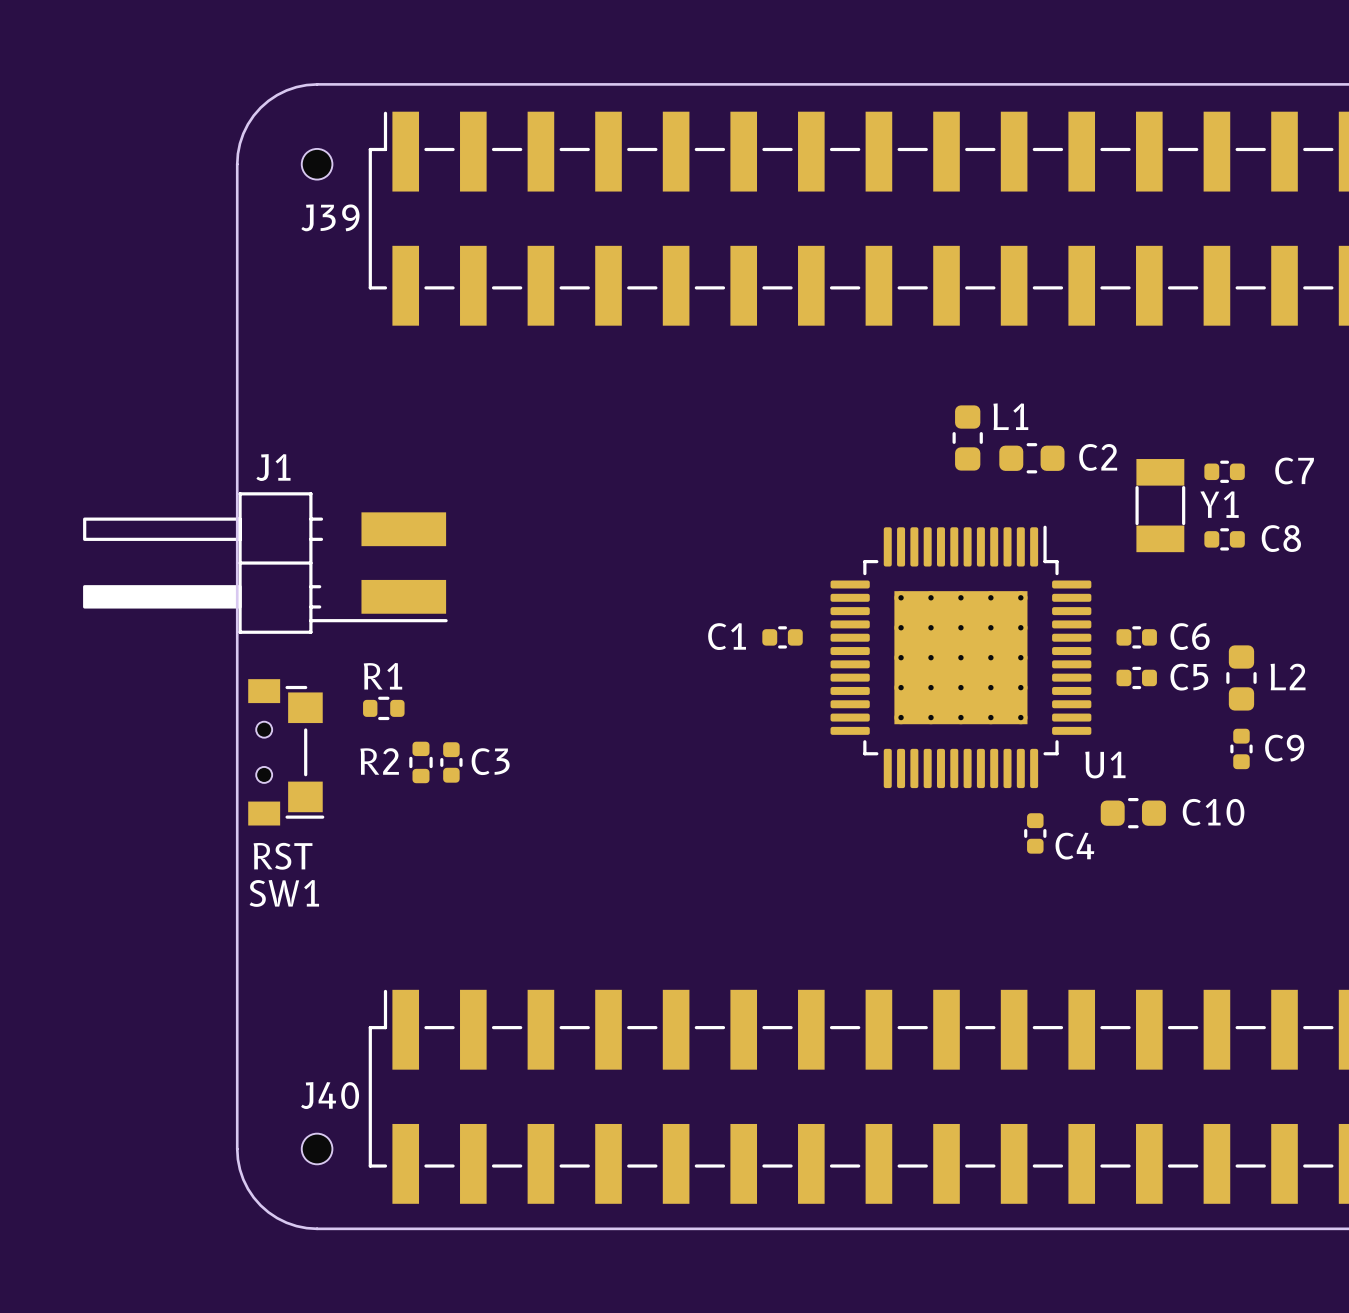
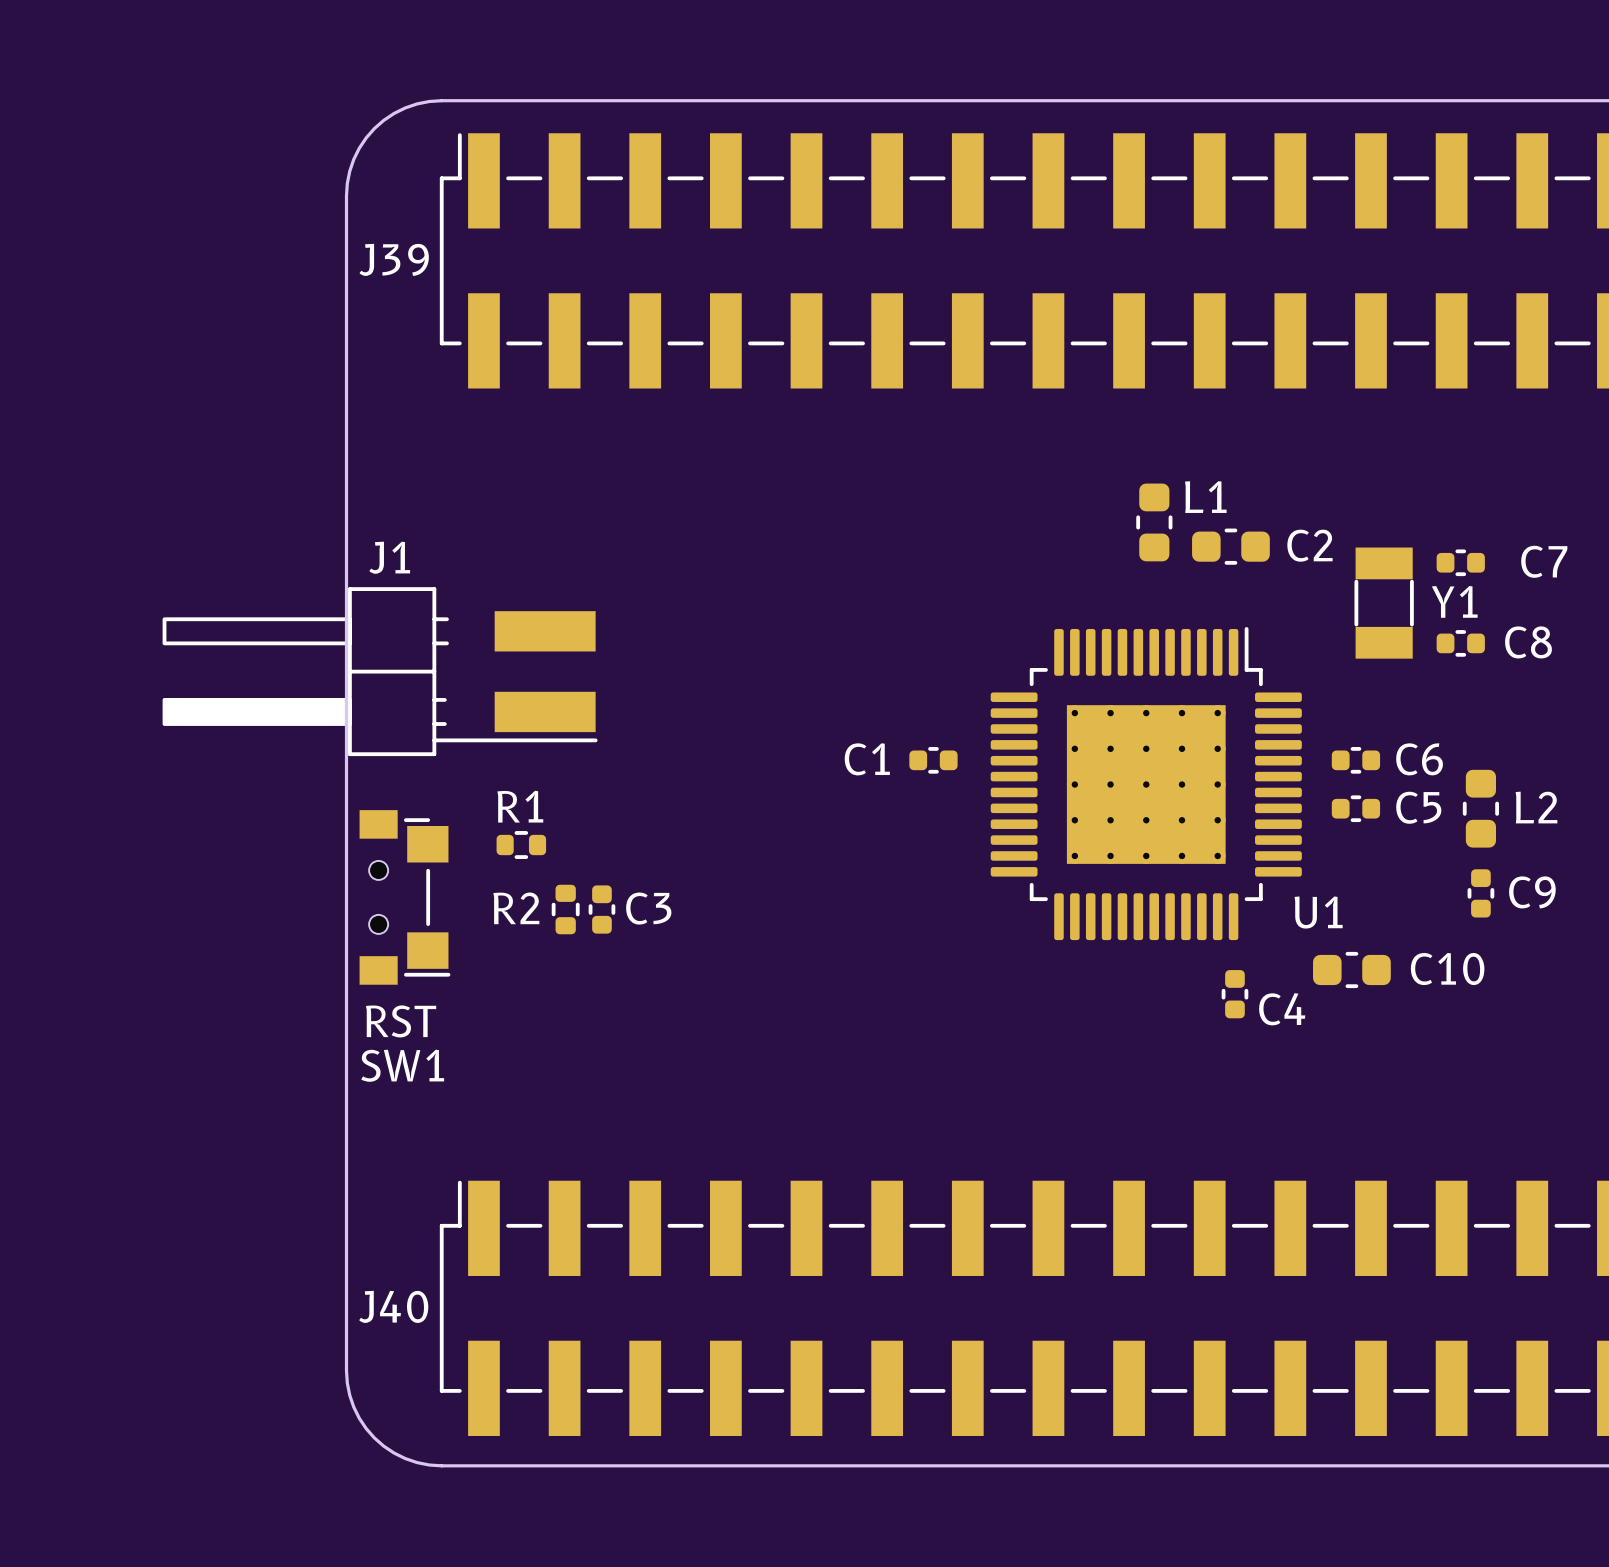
board edge: (370, 84) (306, 85) (277, 95) (260, 107) (247, 124) (239, 143) (237, 164) (237, 1159) (247, 1188) (260, 1205) (277, 1218) (306, 1228) (370, 1228) -> (441, 100) (417, 103) (405, 107) (394, 113) (374, 128) (366, 137) (353, 159) (349, 171) (346, 195) (347, 1383) (349, 1395) (359, 1418) (374, 1437) (383, 1446) (405, 1458) (429, 1465) (441, 1465)
part: (317, 164) -> none
J1 position: (265, 563) -> (380, 671)
R1 position: (383, 708) -> (521, 845)
SW1 position: (286, 752) -> (404, 897)
R2 position: (420, 762) -> (565, 909)
C3 position: (451, 762) -> (601, 909)
part: (317, 1148) -> none

